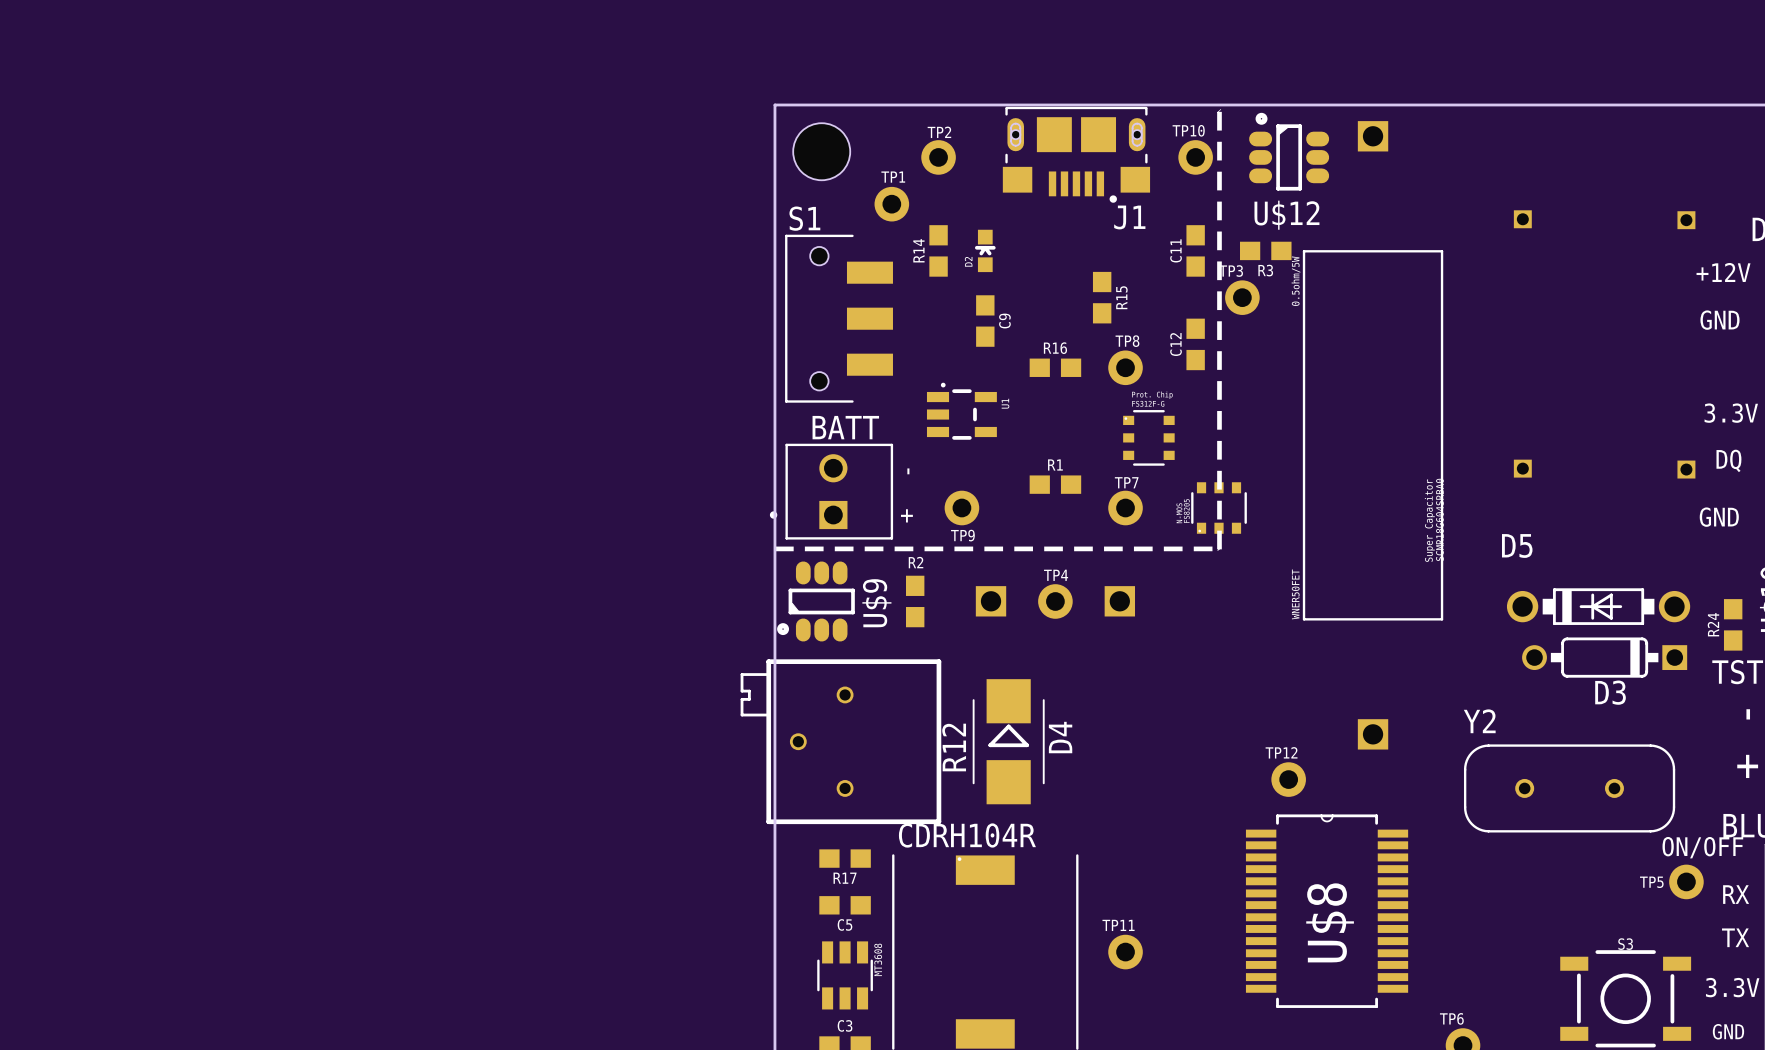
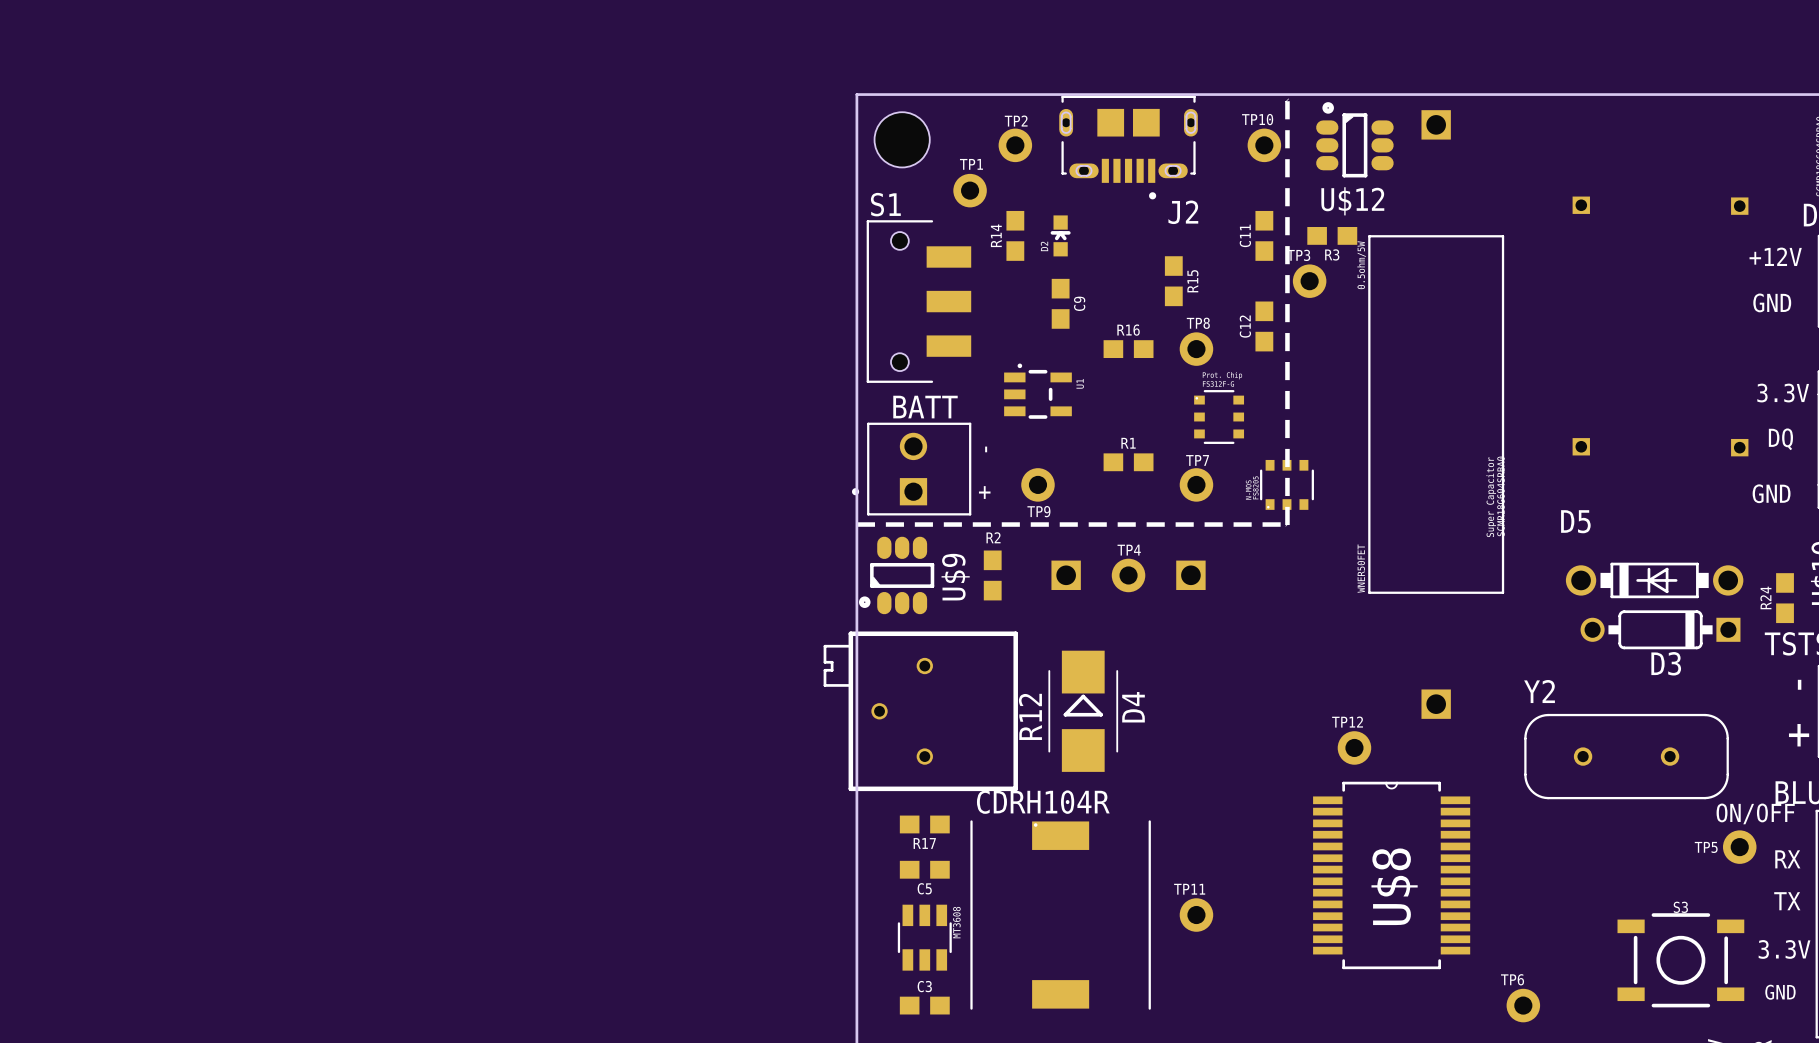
J1: (1076, 154) -> none
J2: none -> (1128, 147)

